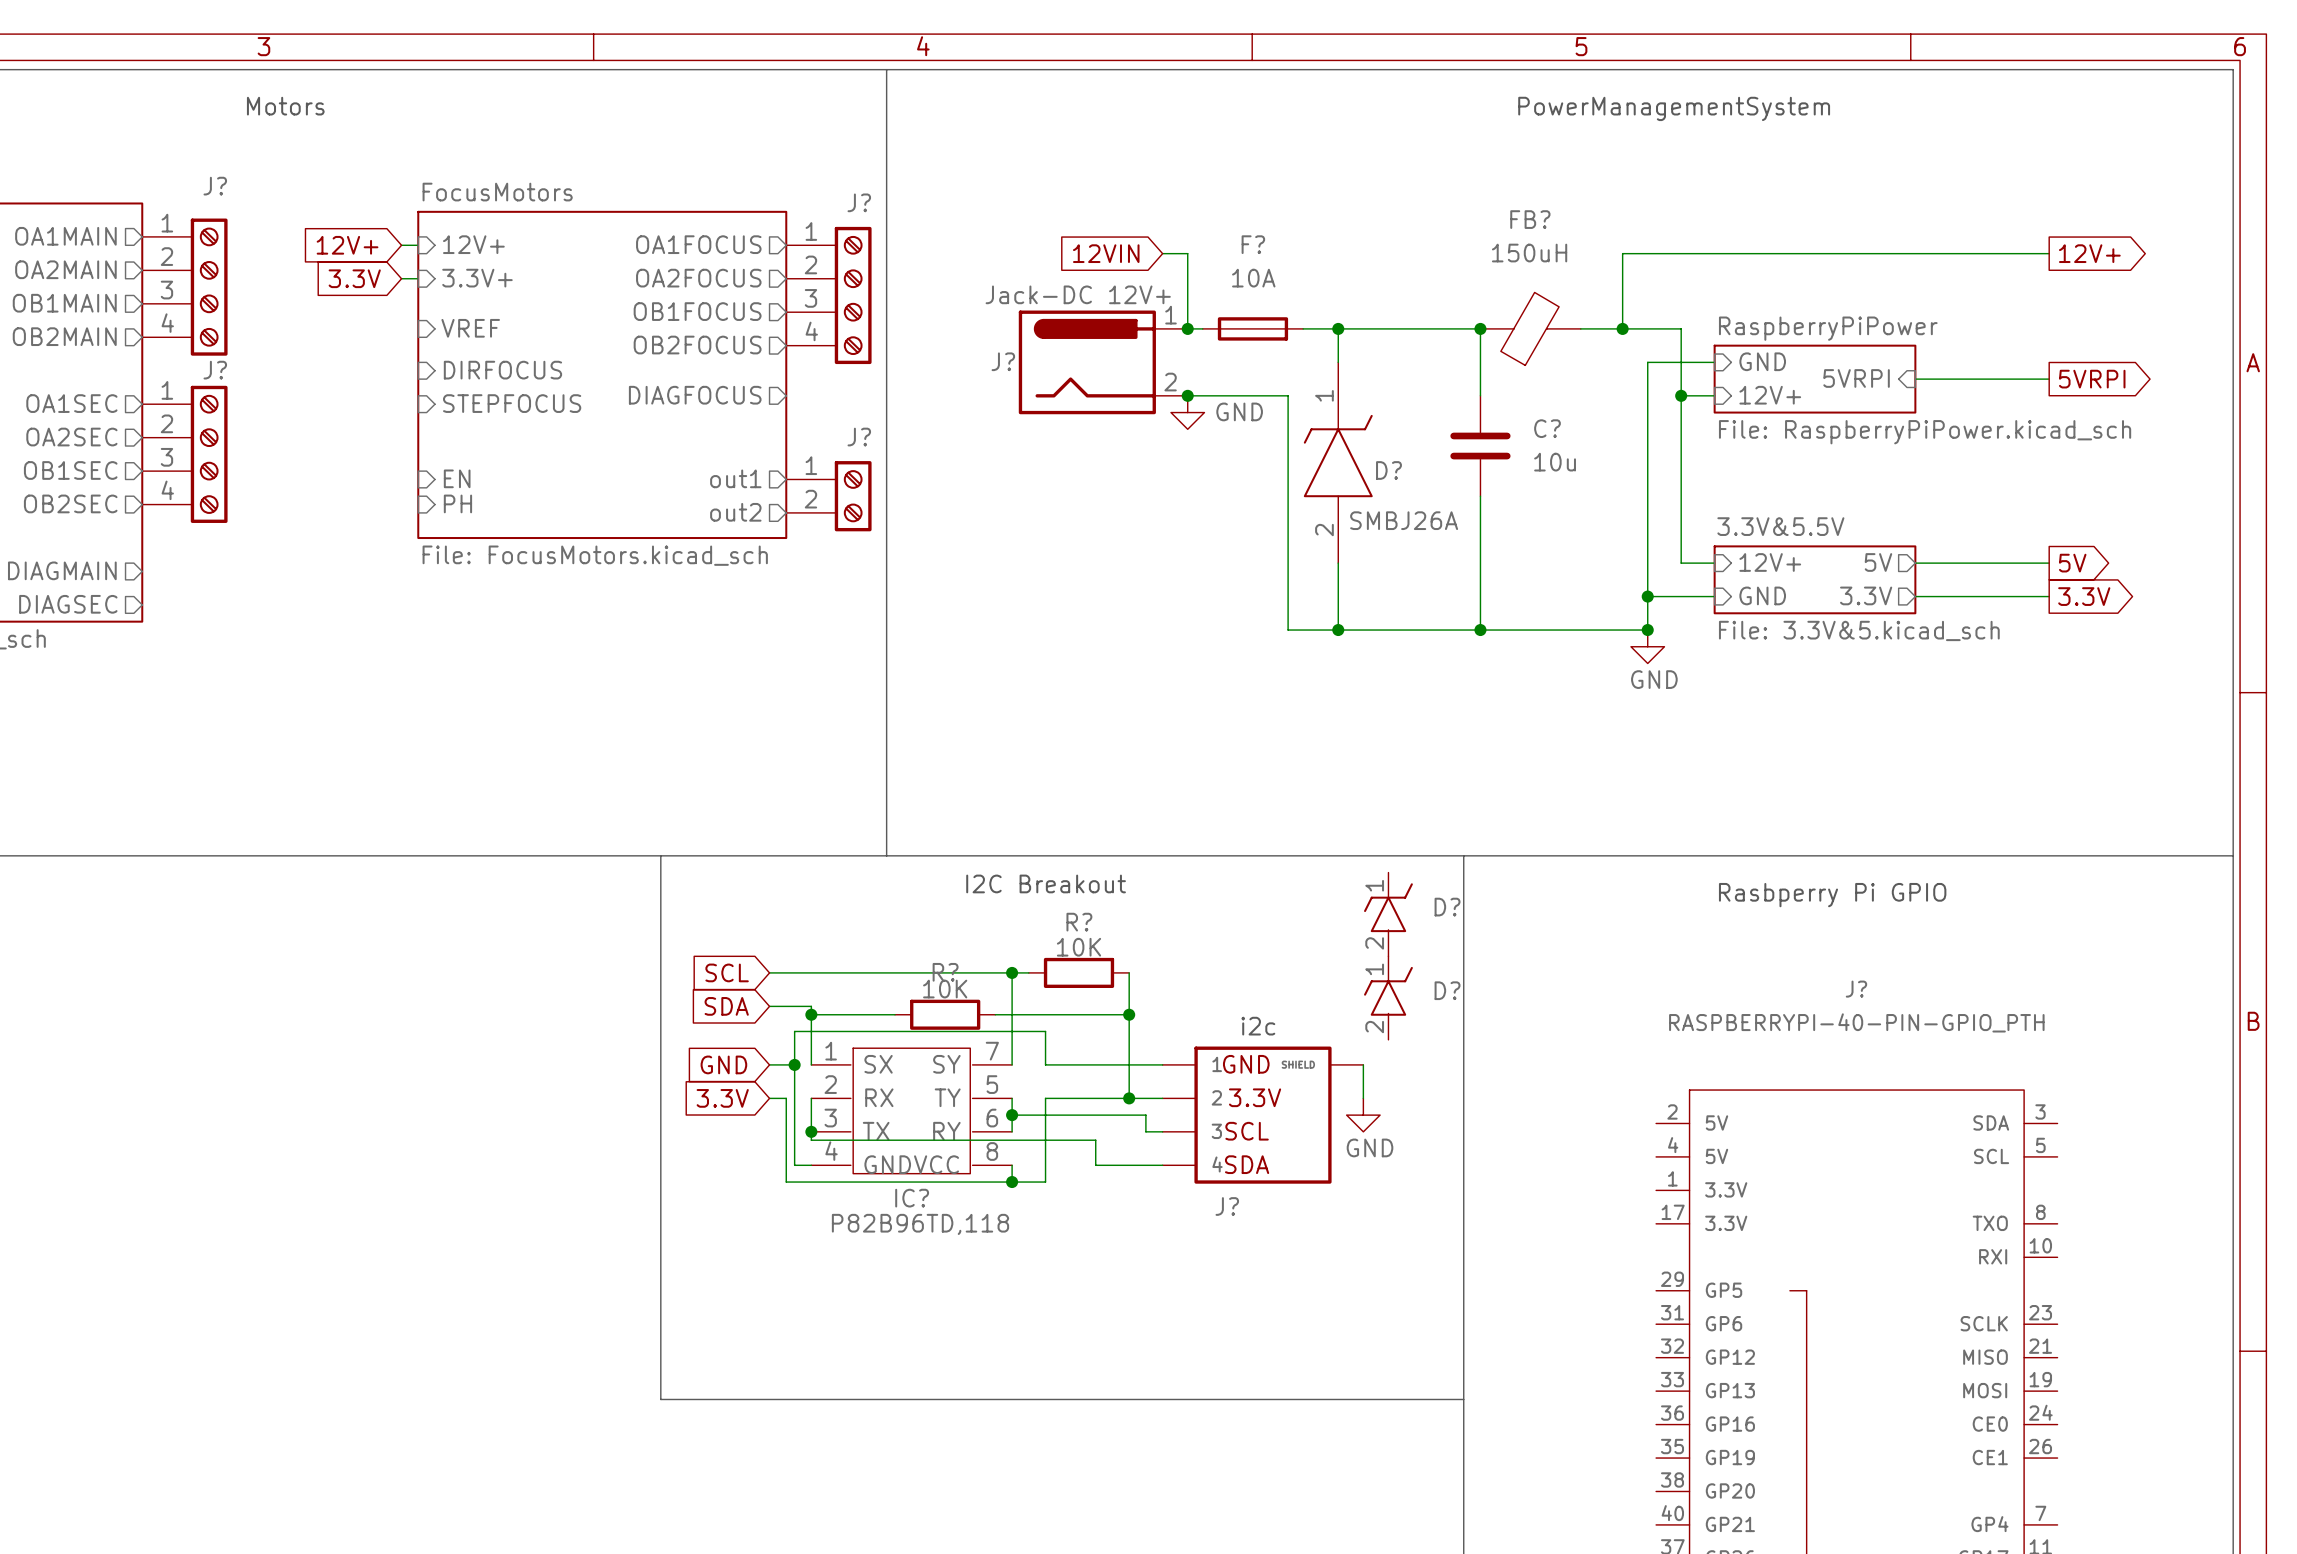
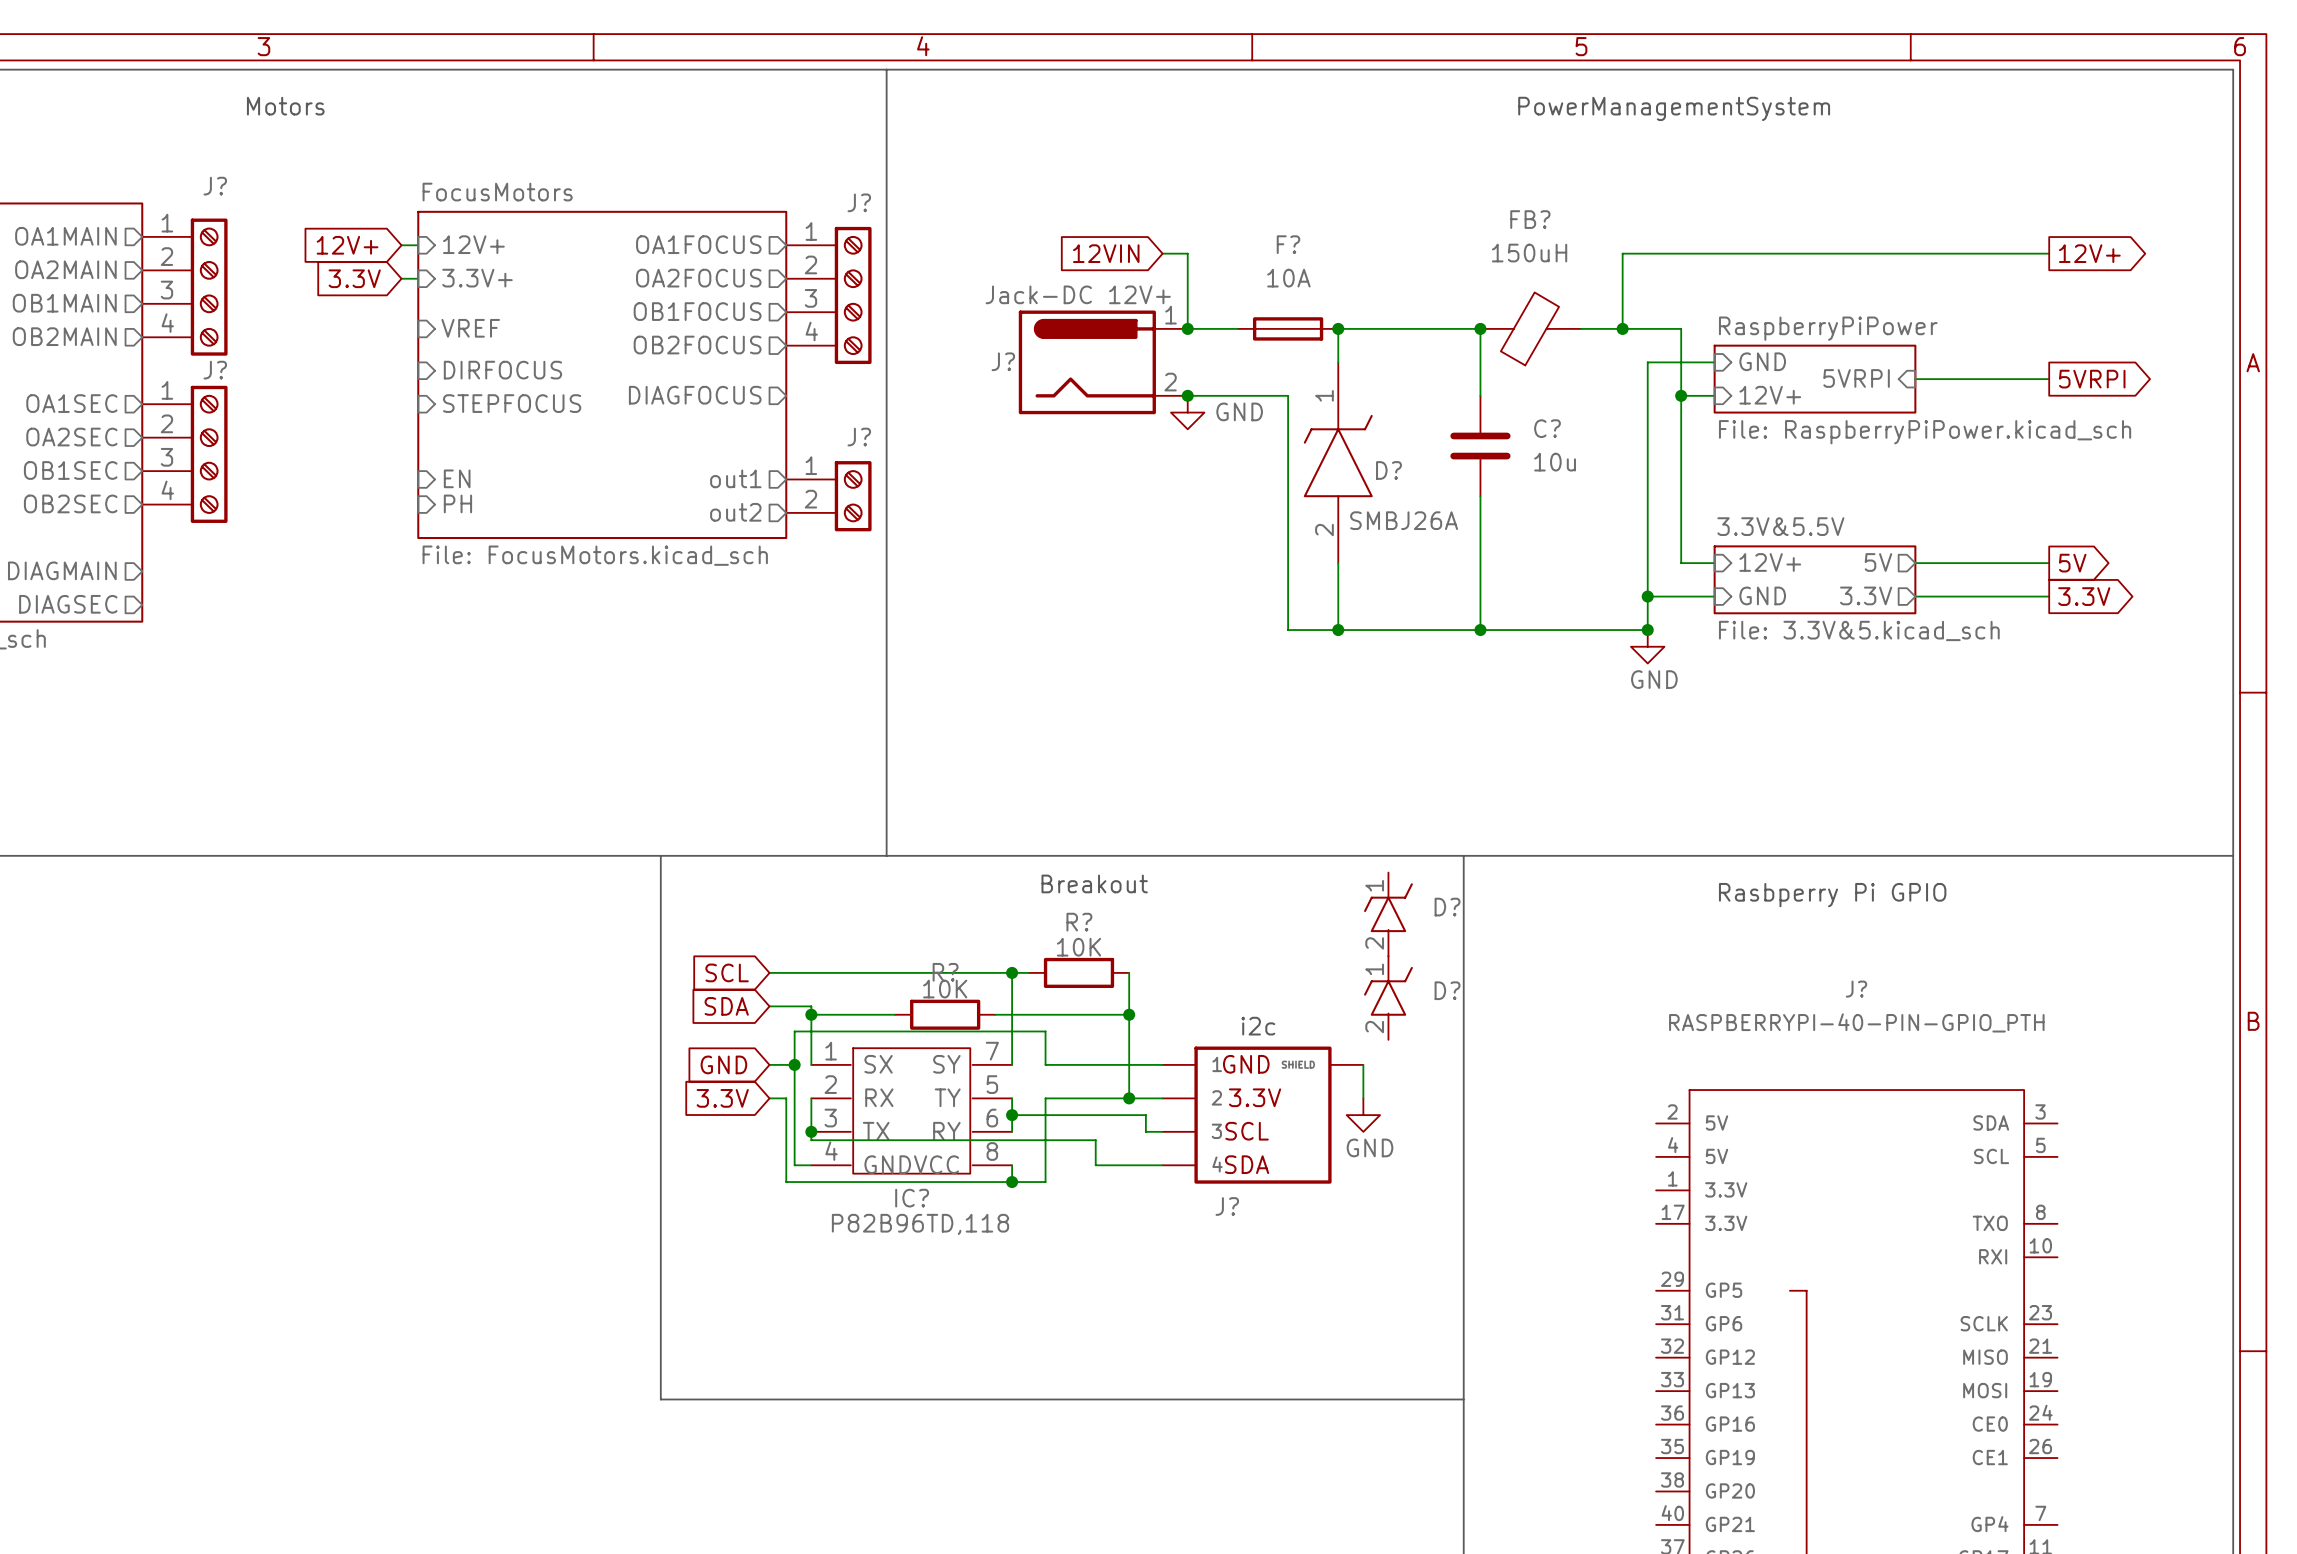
F? position: (1252, 328) -> (1288, 328)
text: I2C Breakout (1046, 883) -> Breakout (1094, 883)

